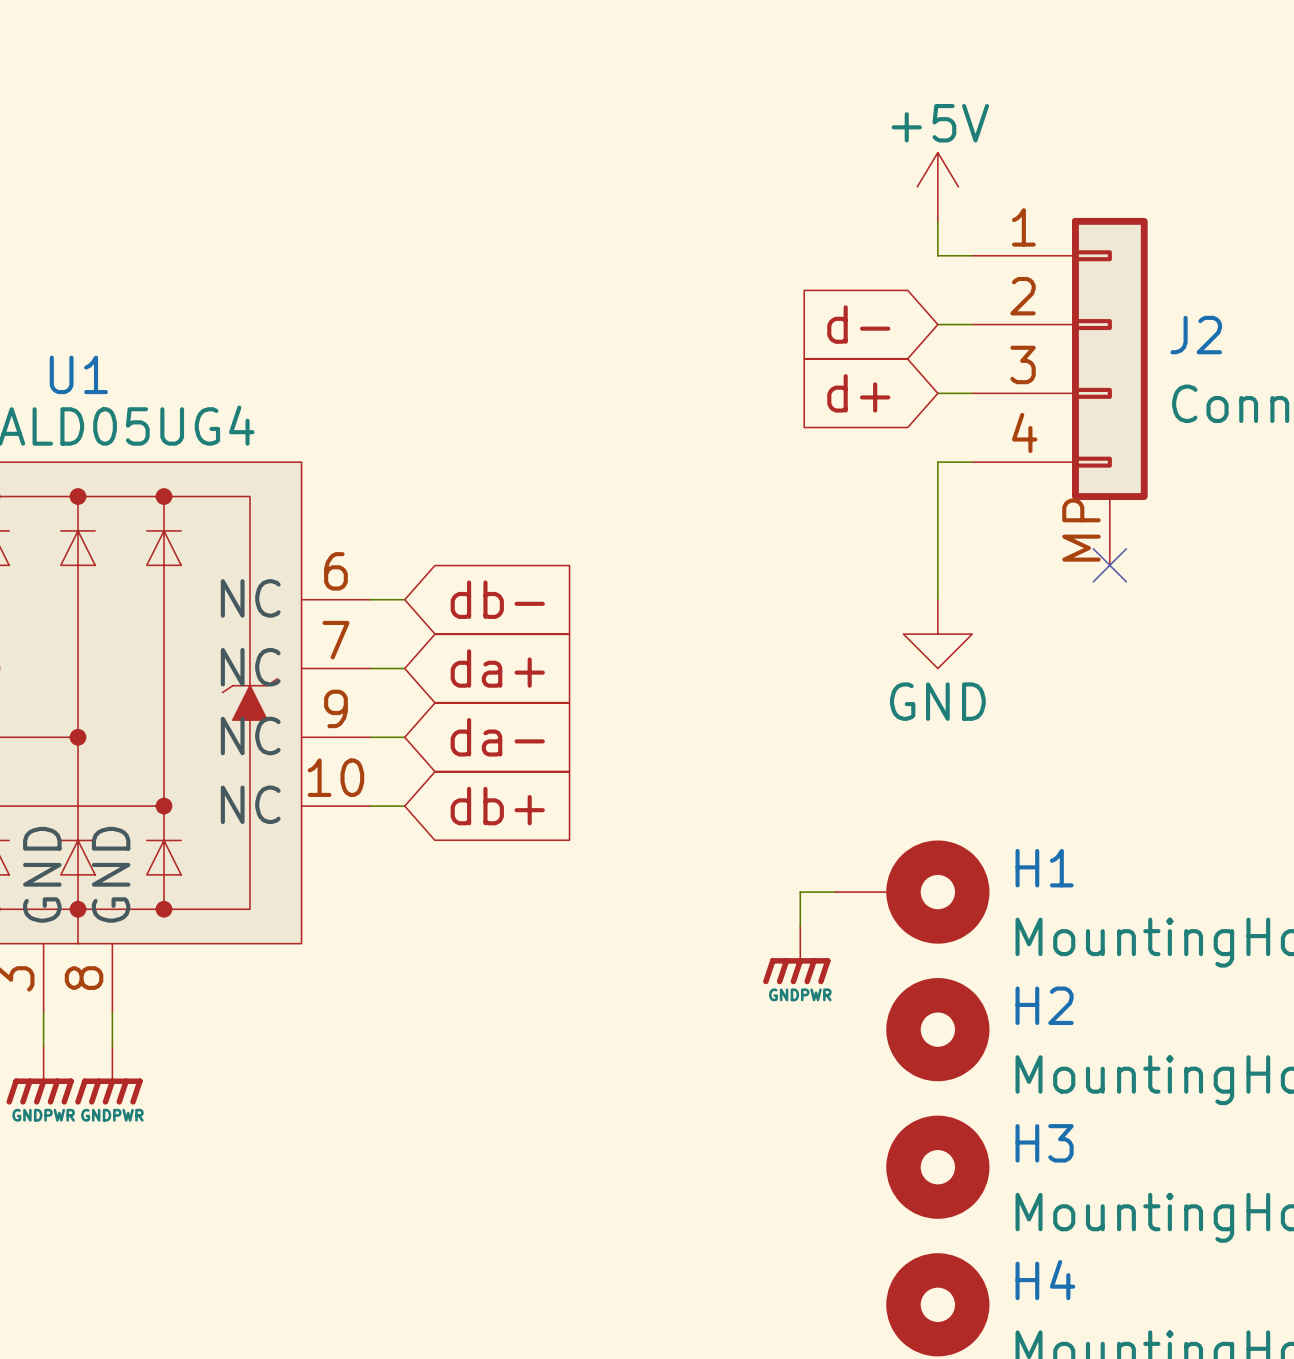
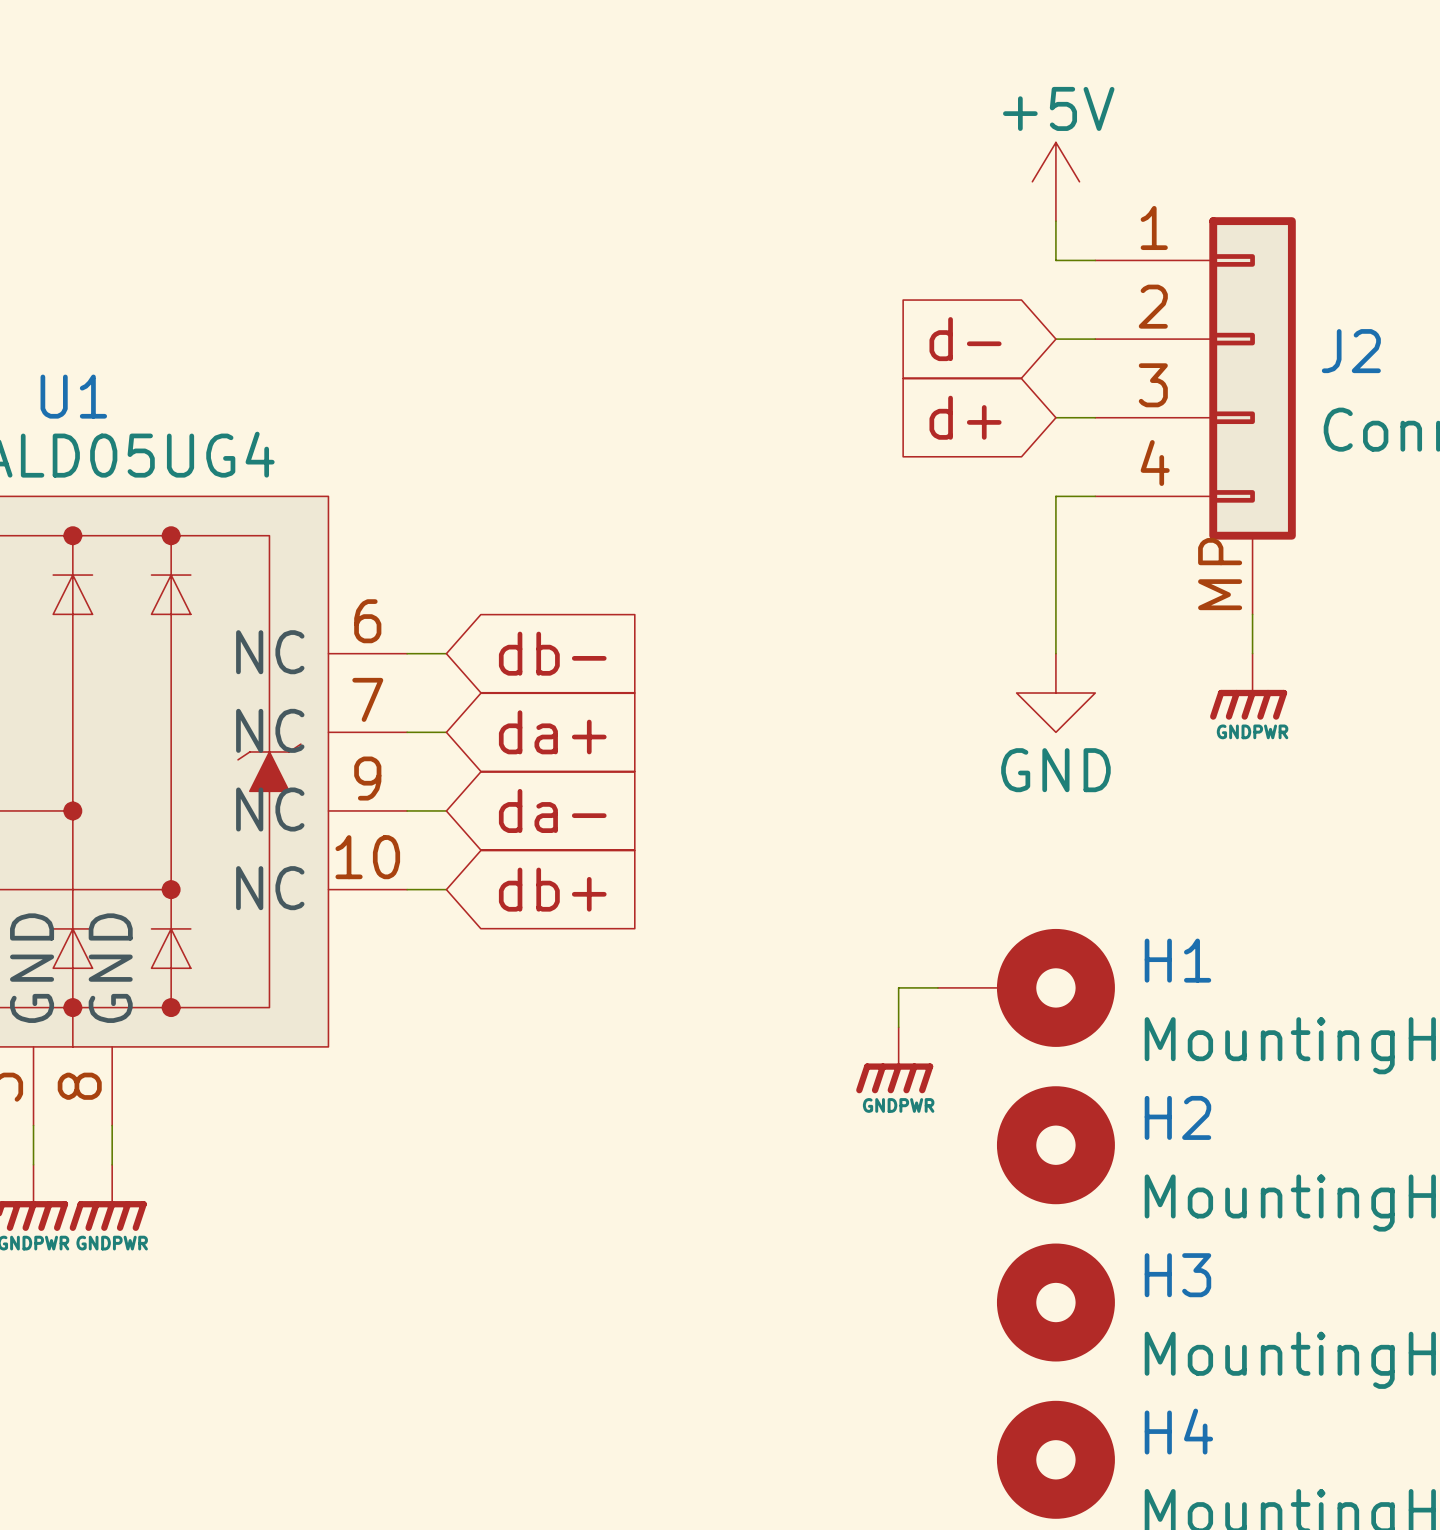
wire: none -> (1252, 614) (1252, 653)
no-connect mark: (1109, 565) -> none
power symbol: none -> GNDPWR (1248, 686)

